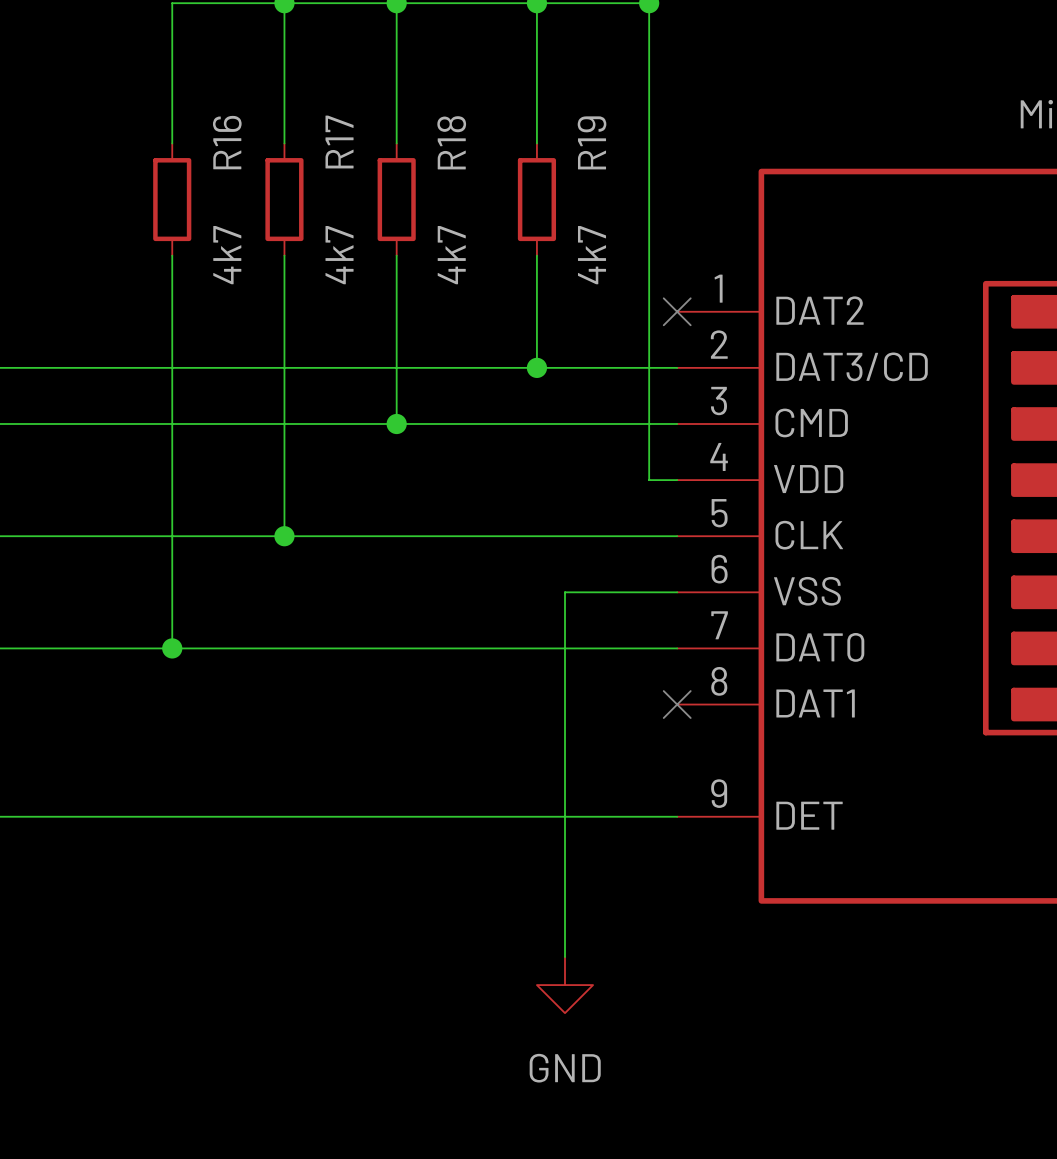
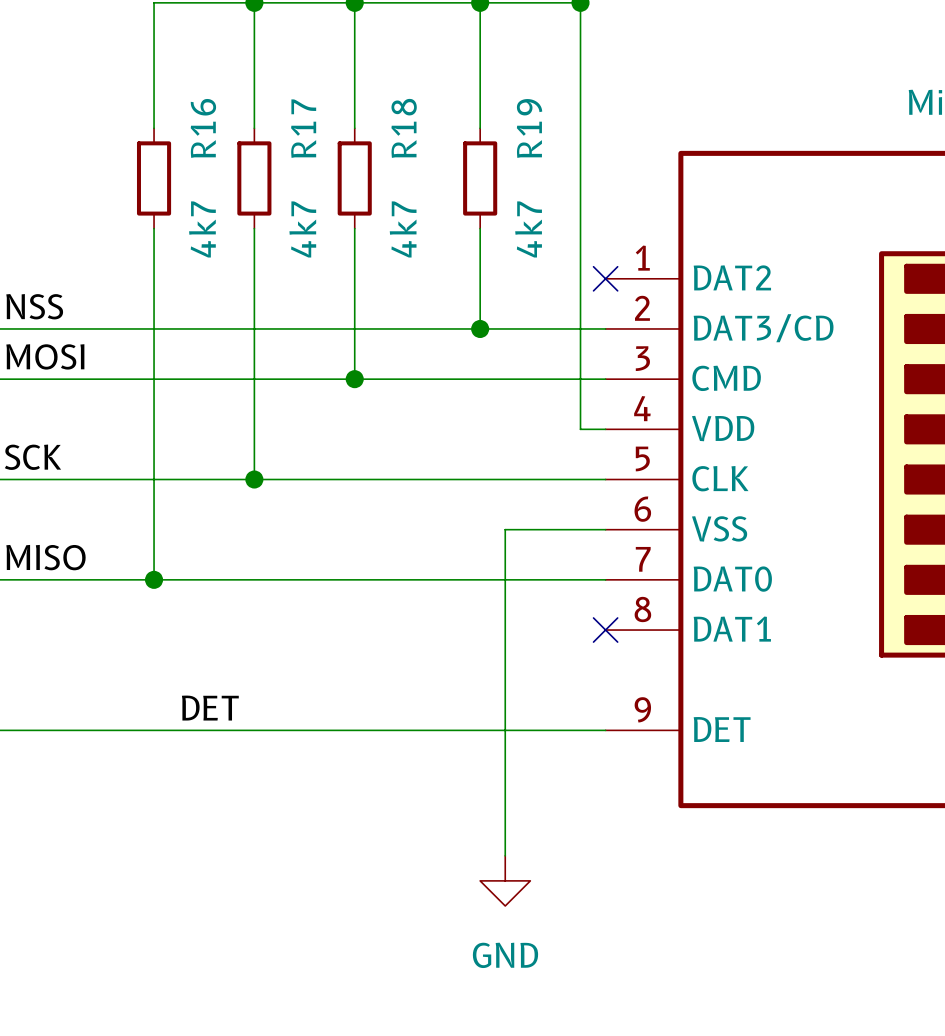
label: none -> NSS (34, 306)
label: none -> MOSI (45, 356)
label: none -> SCK (32, 457)
label: none -> MISO (45, 557)
label: none -> DET (210, 708)

